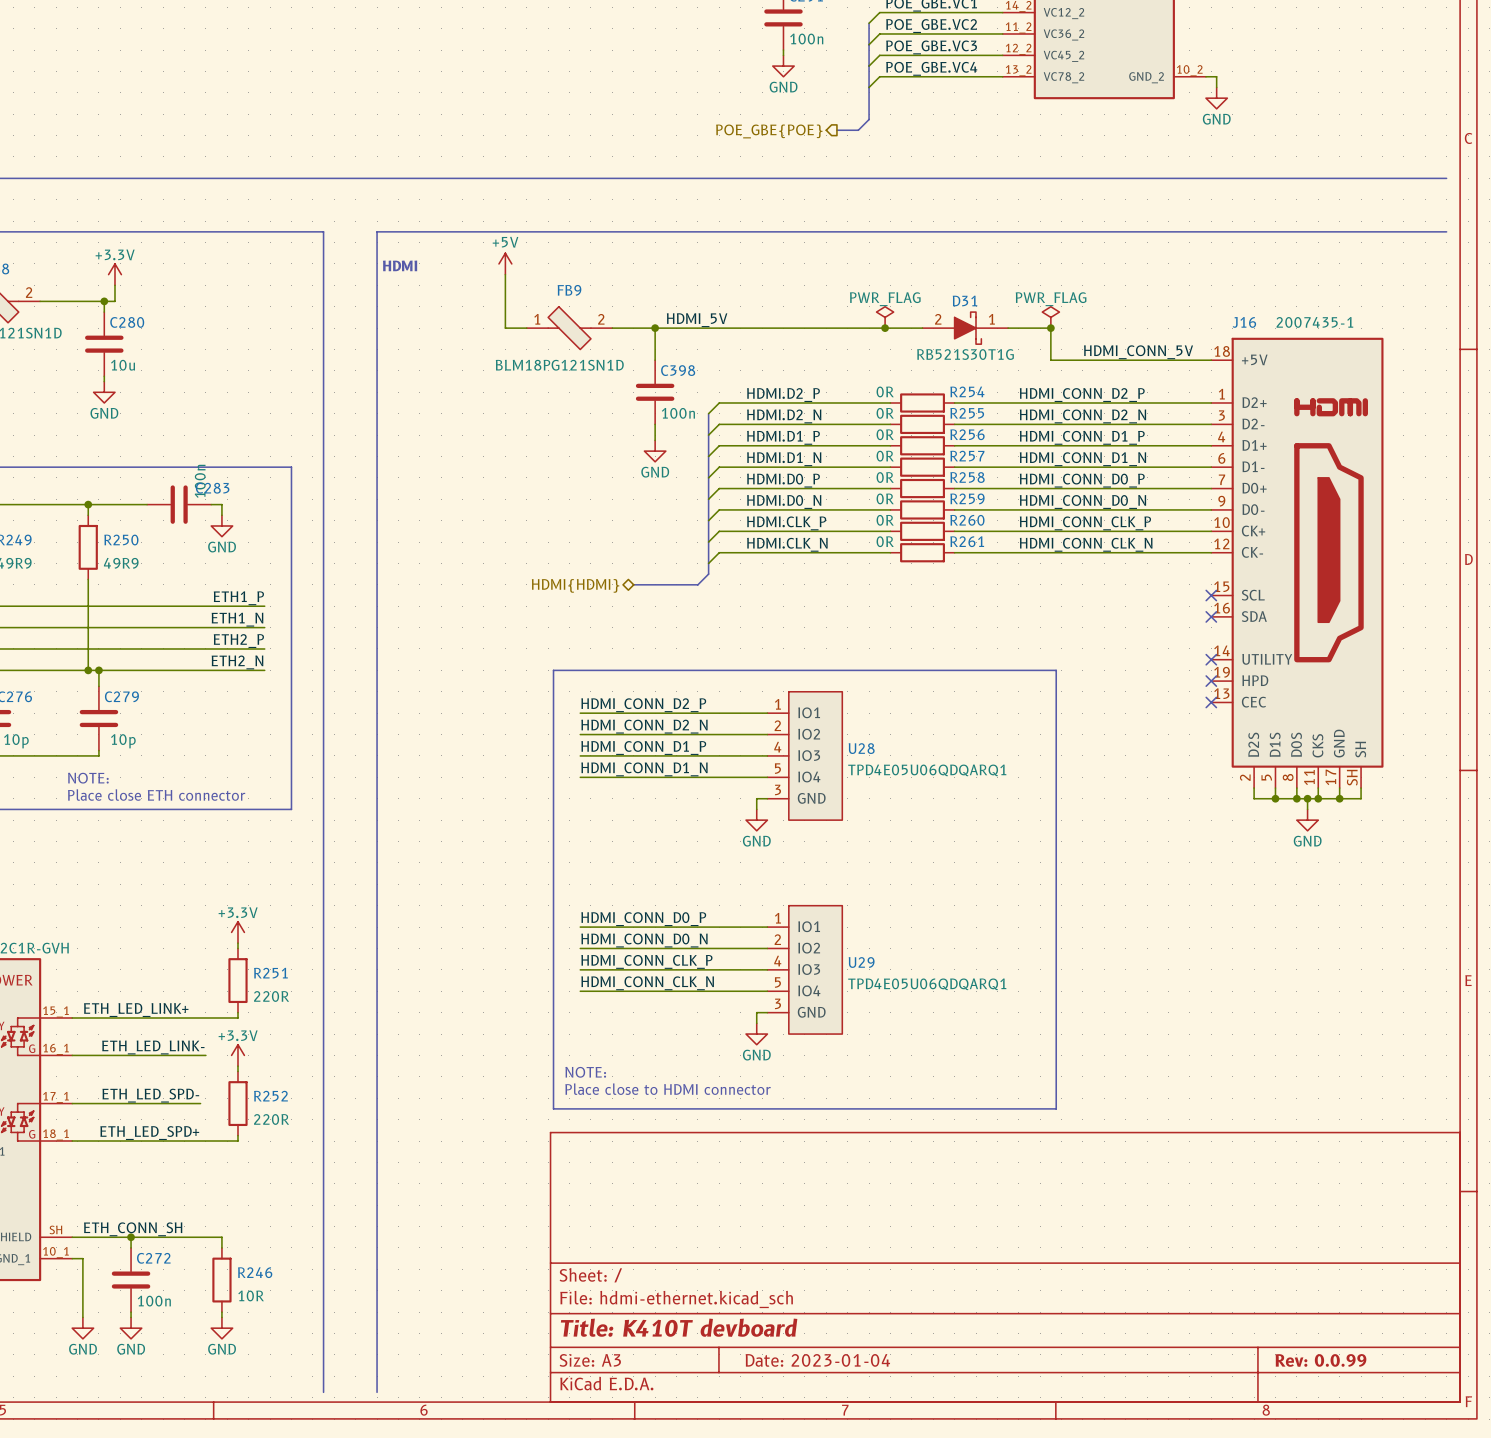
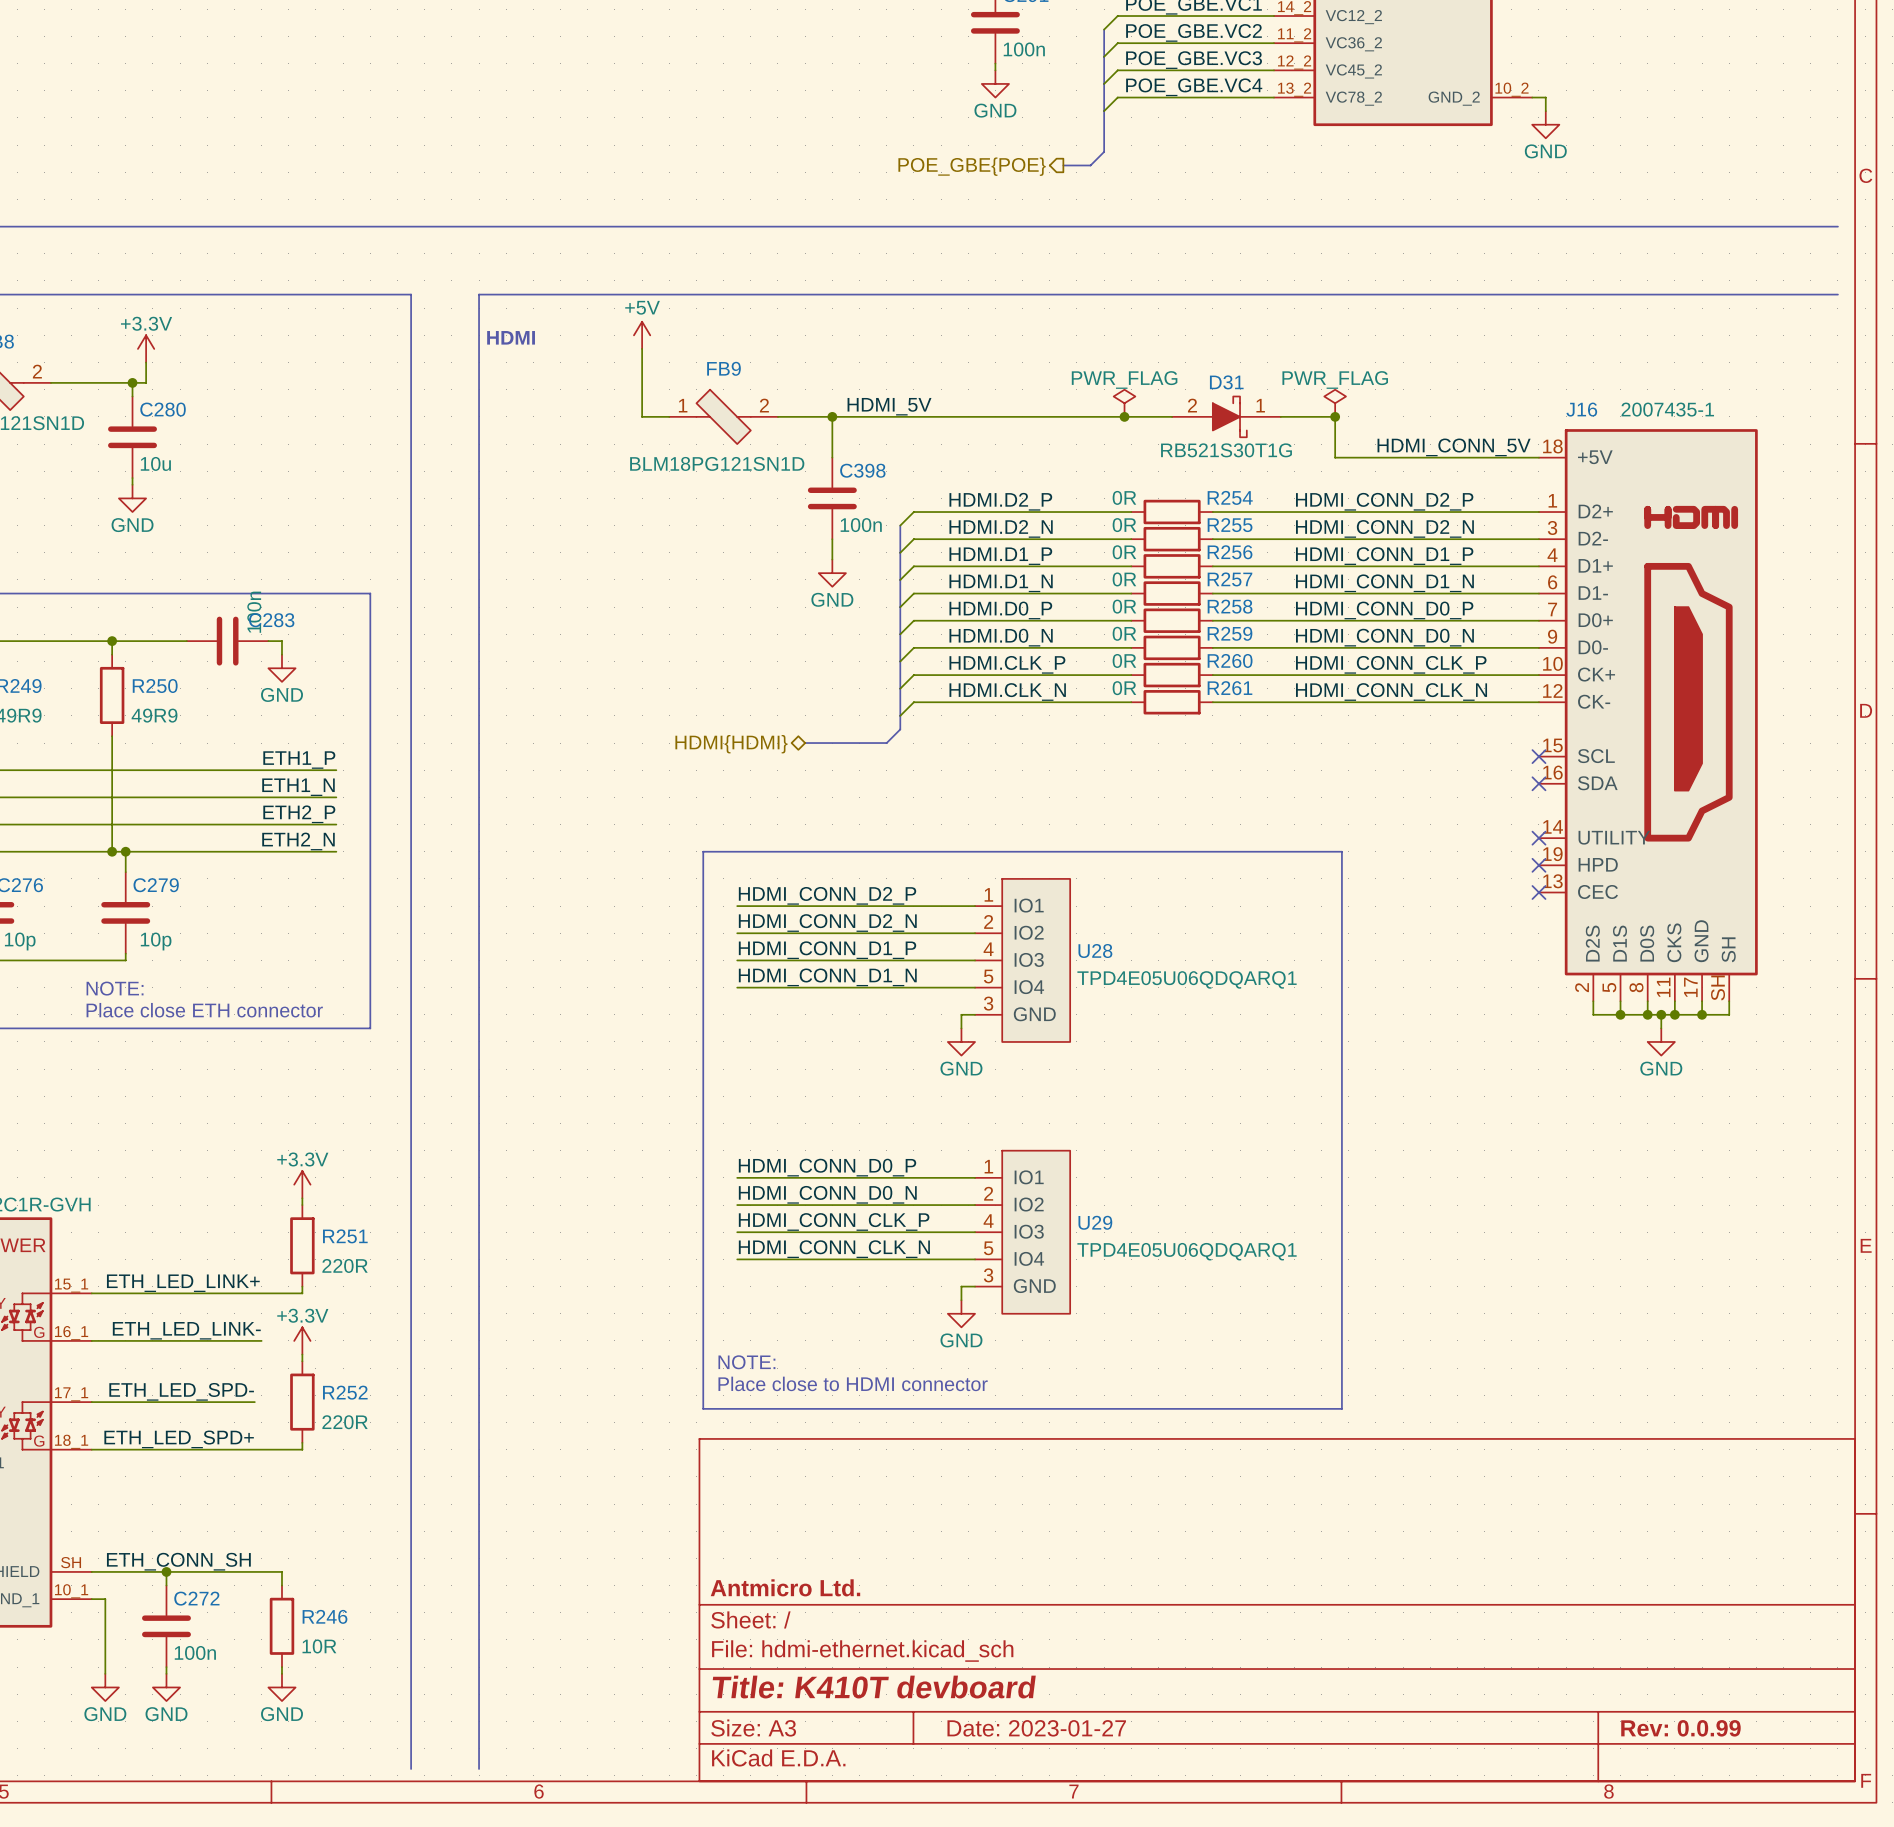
title block: none -> Antmicro Ltd. (785, 1587)
title block: Date: 2023-01-04 (817, 1360) -> Date: 2023-01-27 (1036, 1728)

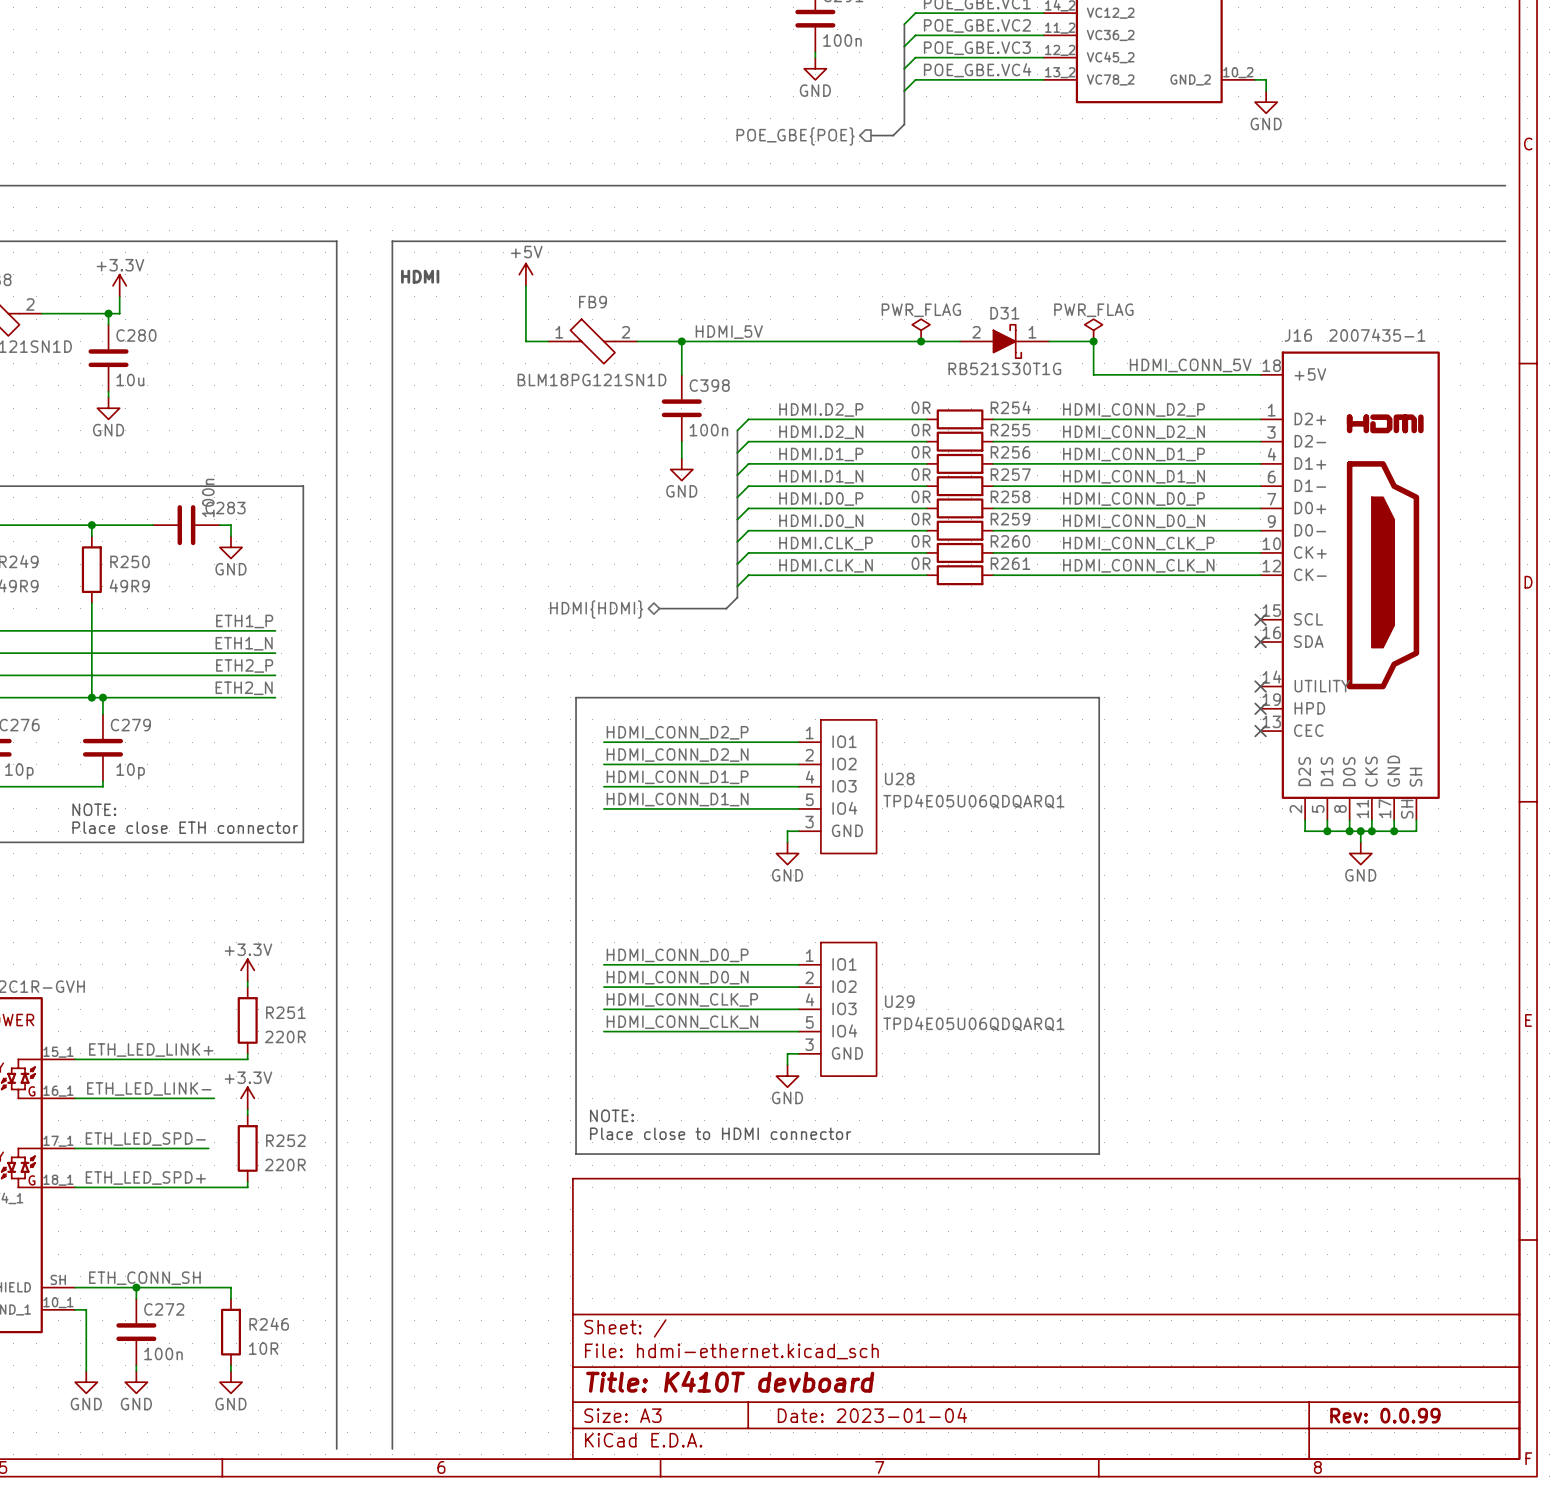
title block: Antmicro Ltd. (785, 1587) -> none
title block: Date: 2023-01-27 (1036, 1728) -> Date: 2023-01-04 (872, 1415)

